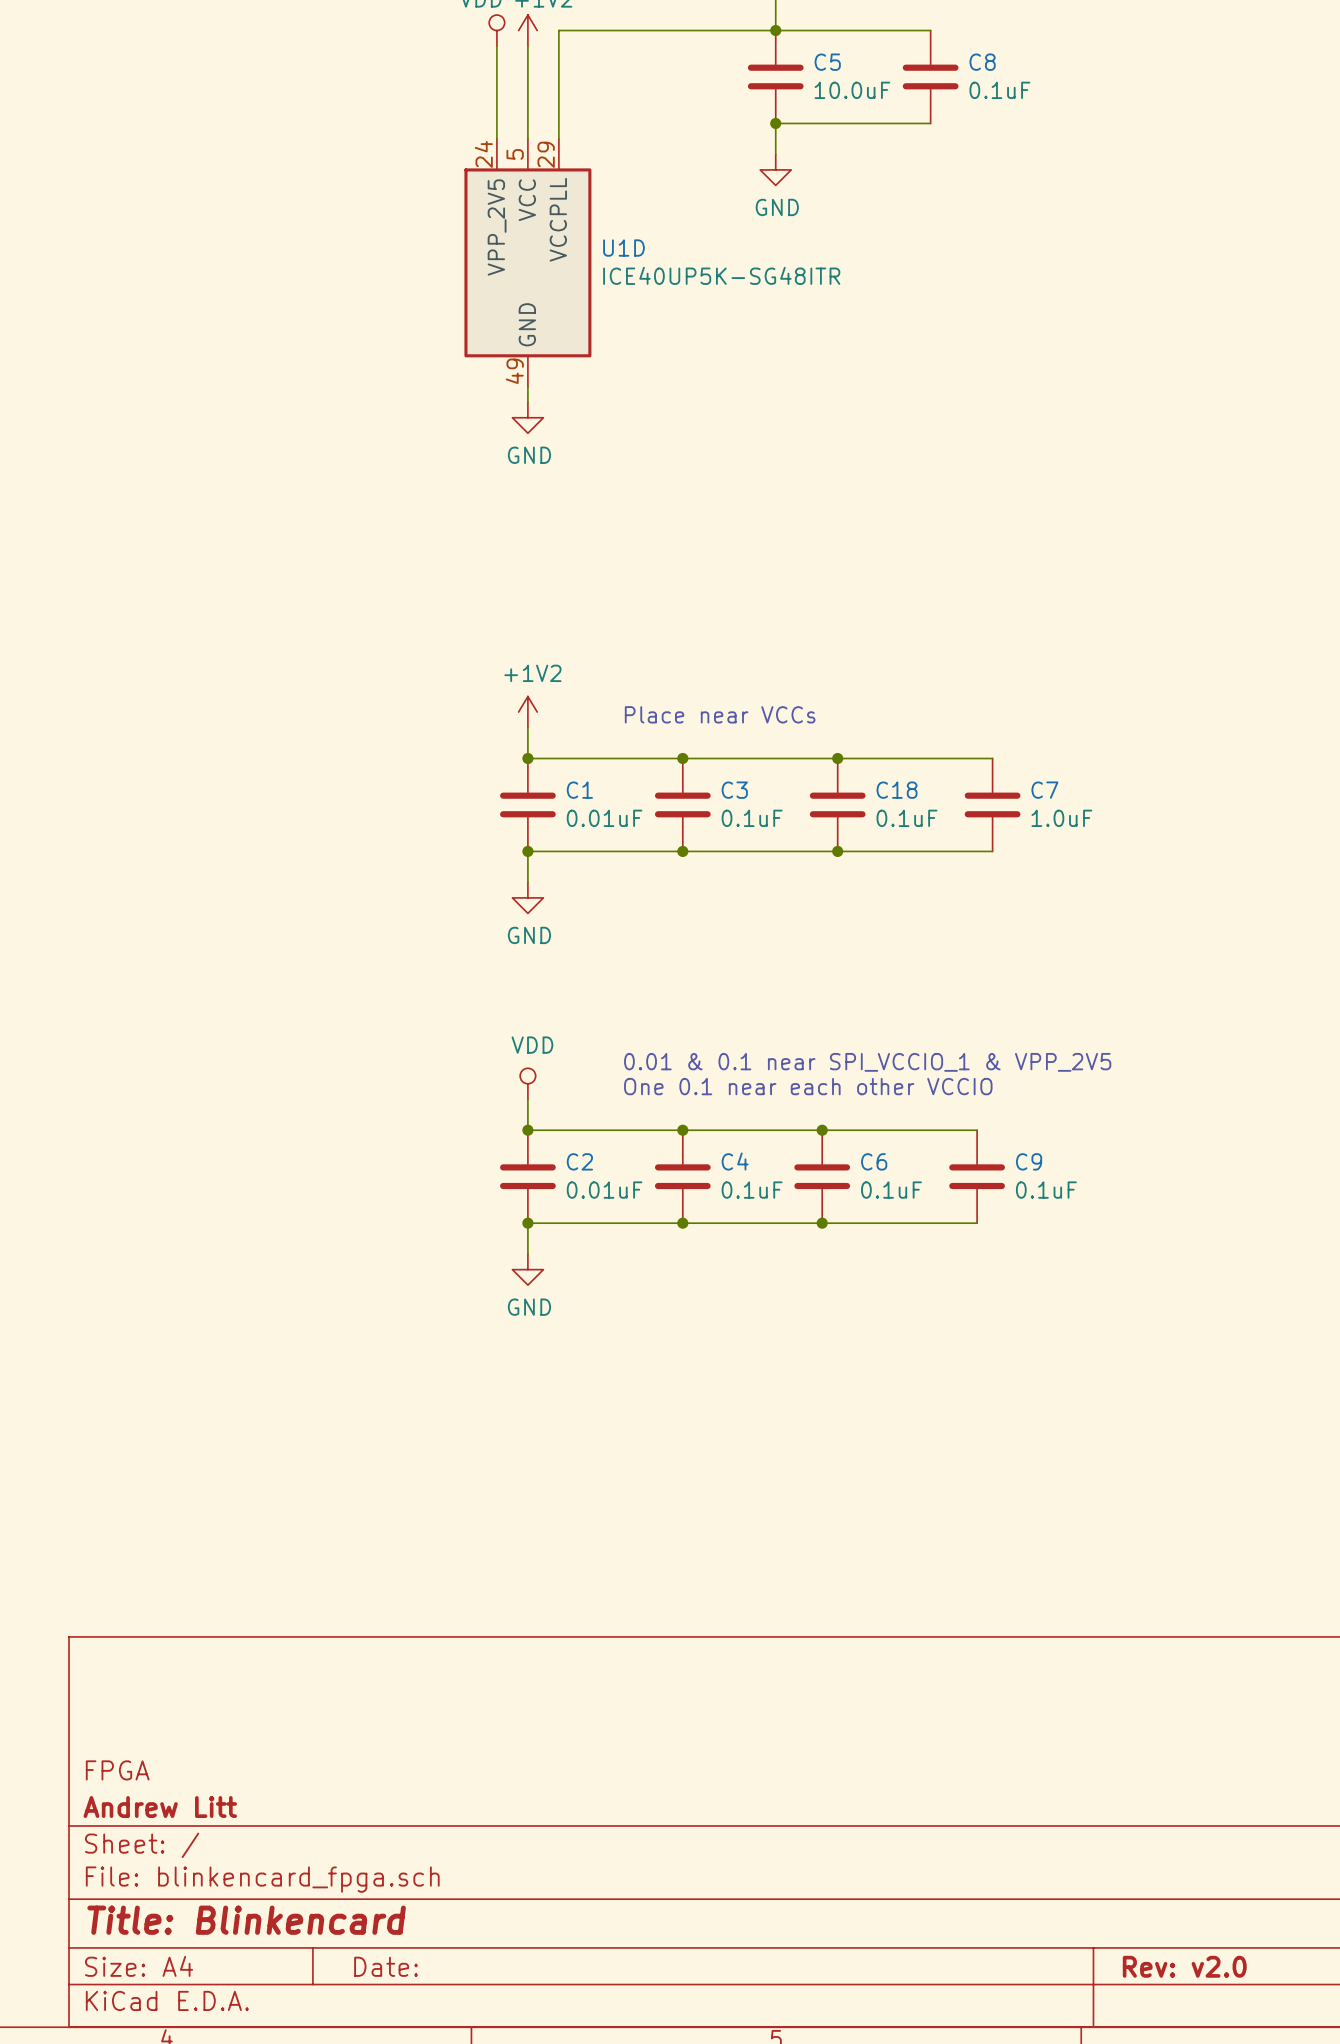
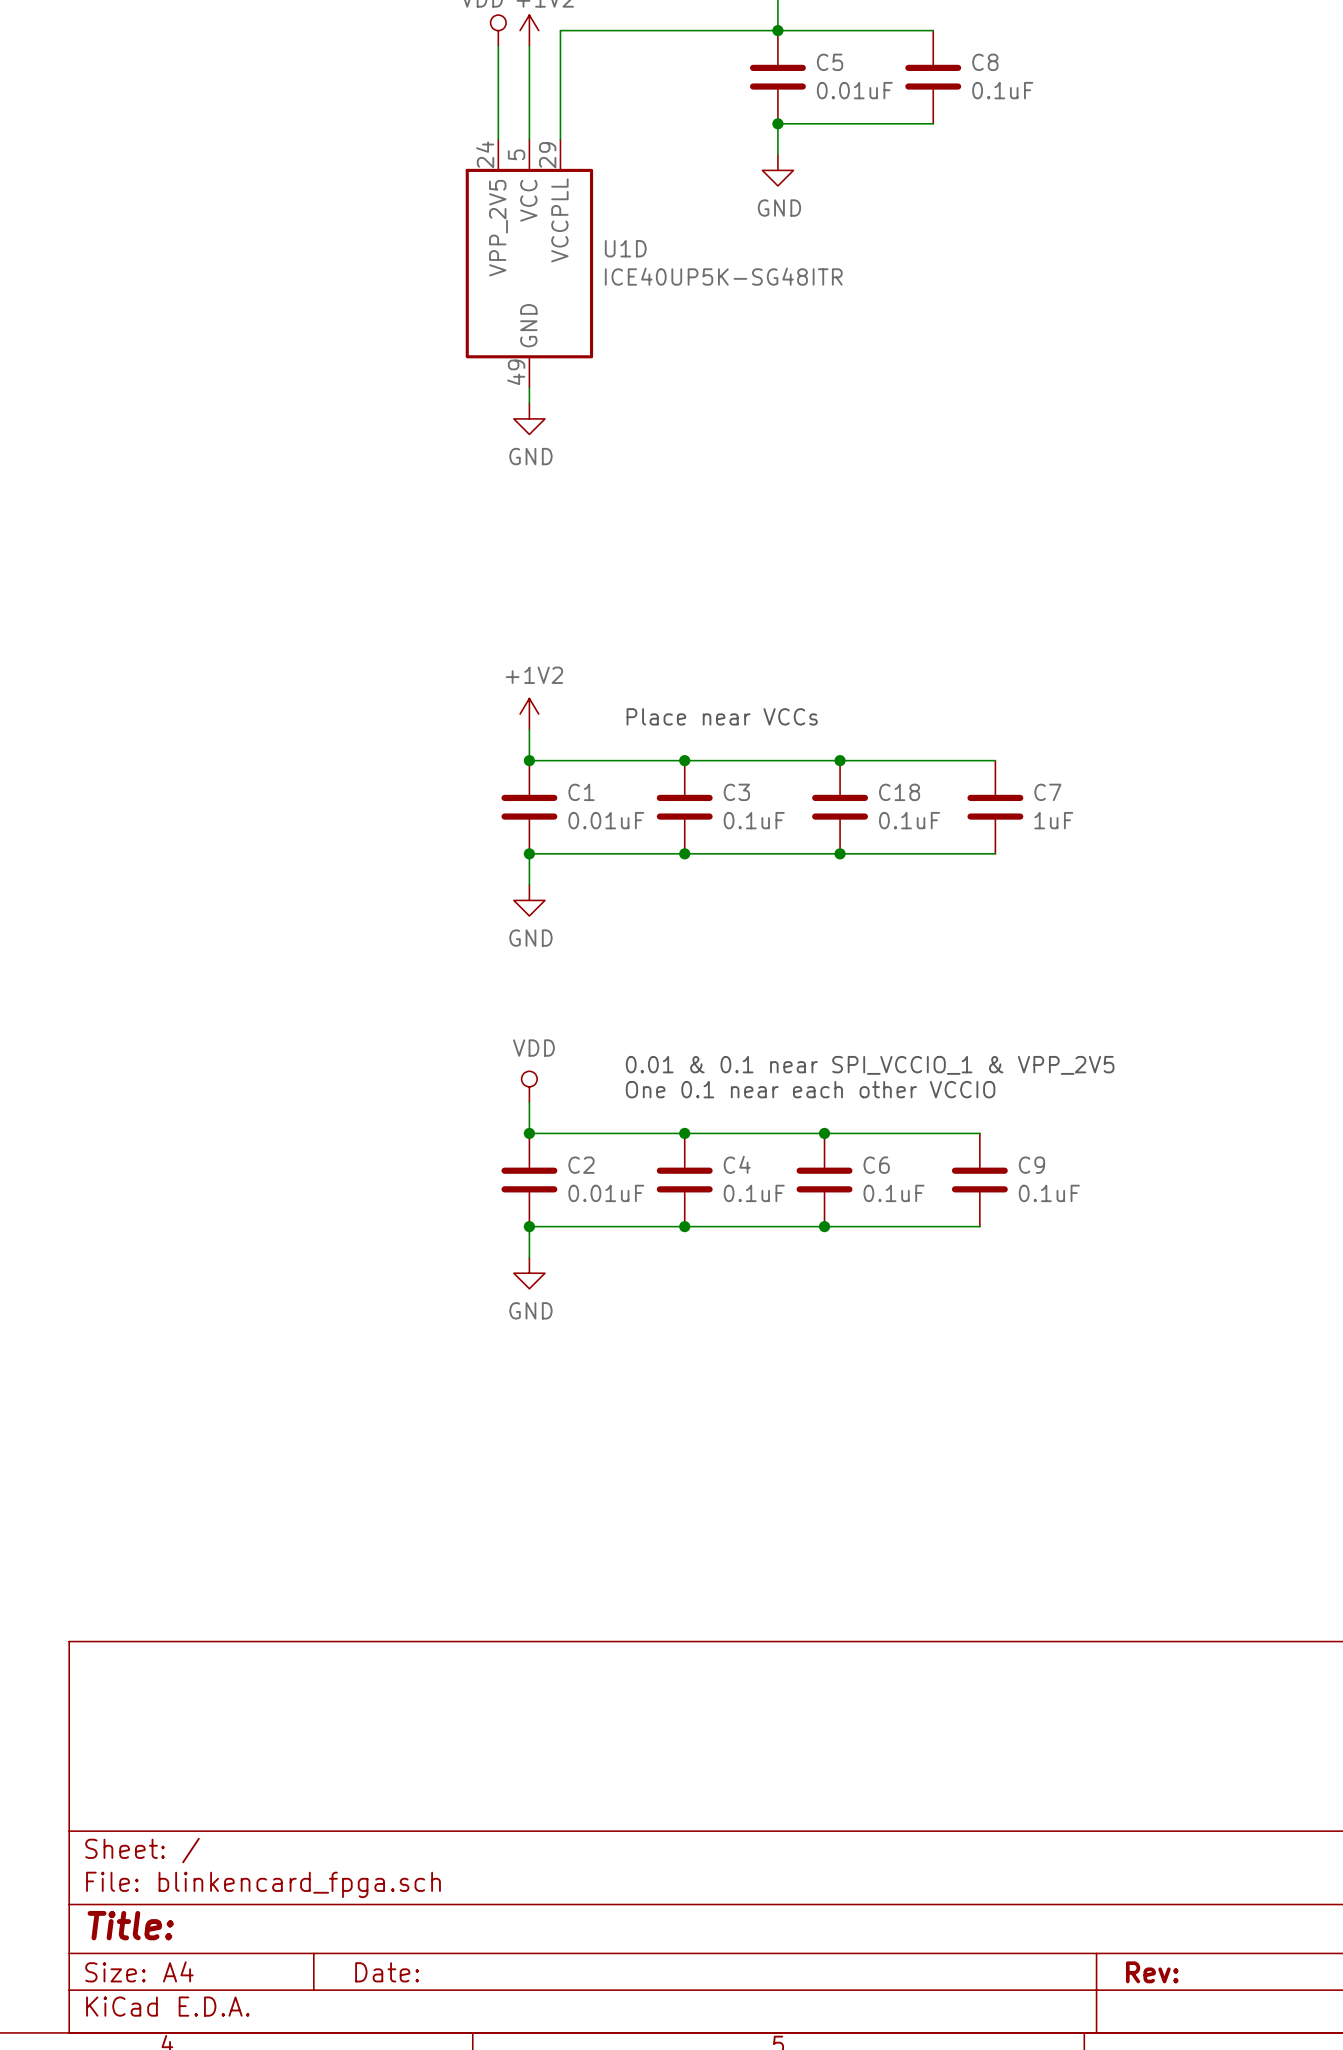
C5 value: 10.0uF (852, 90) -> 0.01uF (854, 90)
C7 value: 1.0uF (1061, 818) -> 1uF (1053, 820)
title block: FPGA (117, 1770) -> none
title block: Andrew Litt (160, 1807) -> none
title block: Title: Blinkencard (246, 1920) -> Title: (130, 1925)
title block: Rev: v2.0 (1184, 1966) -> Rev: (1152, 1972)

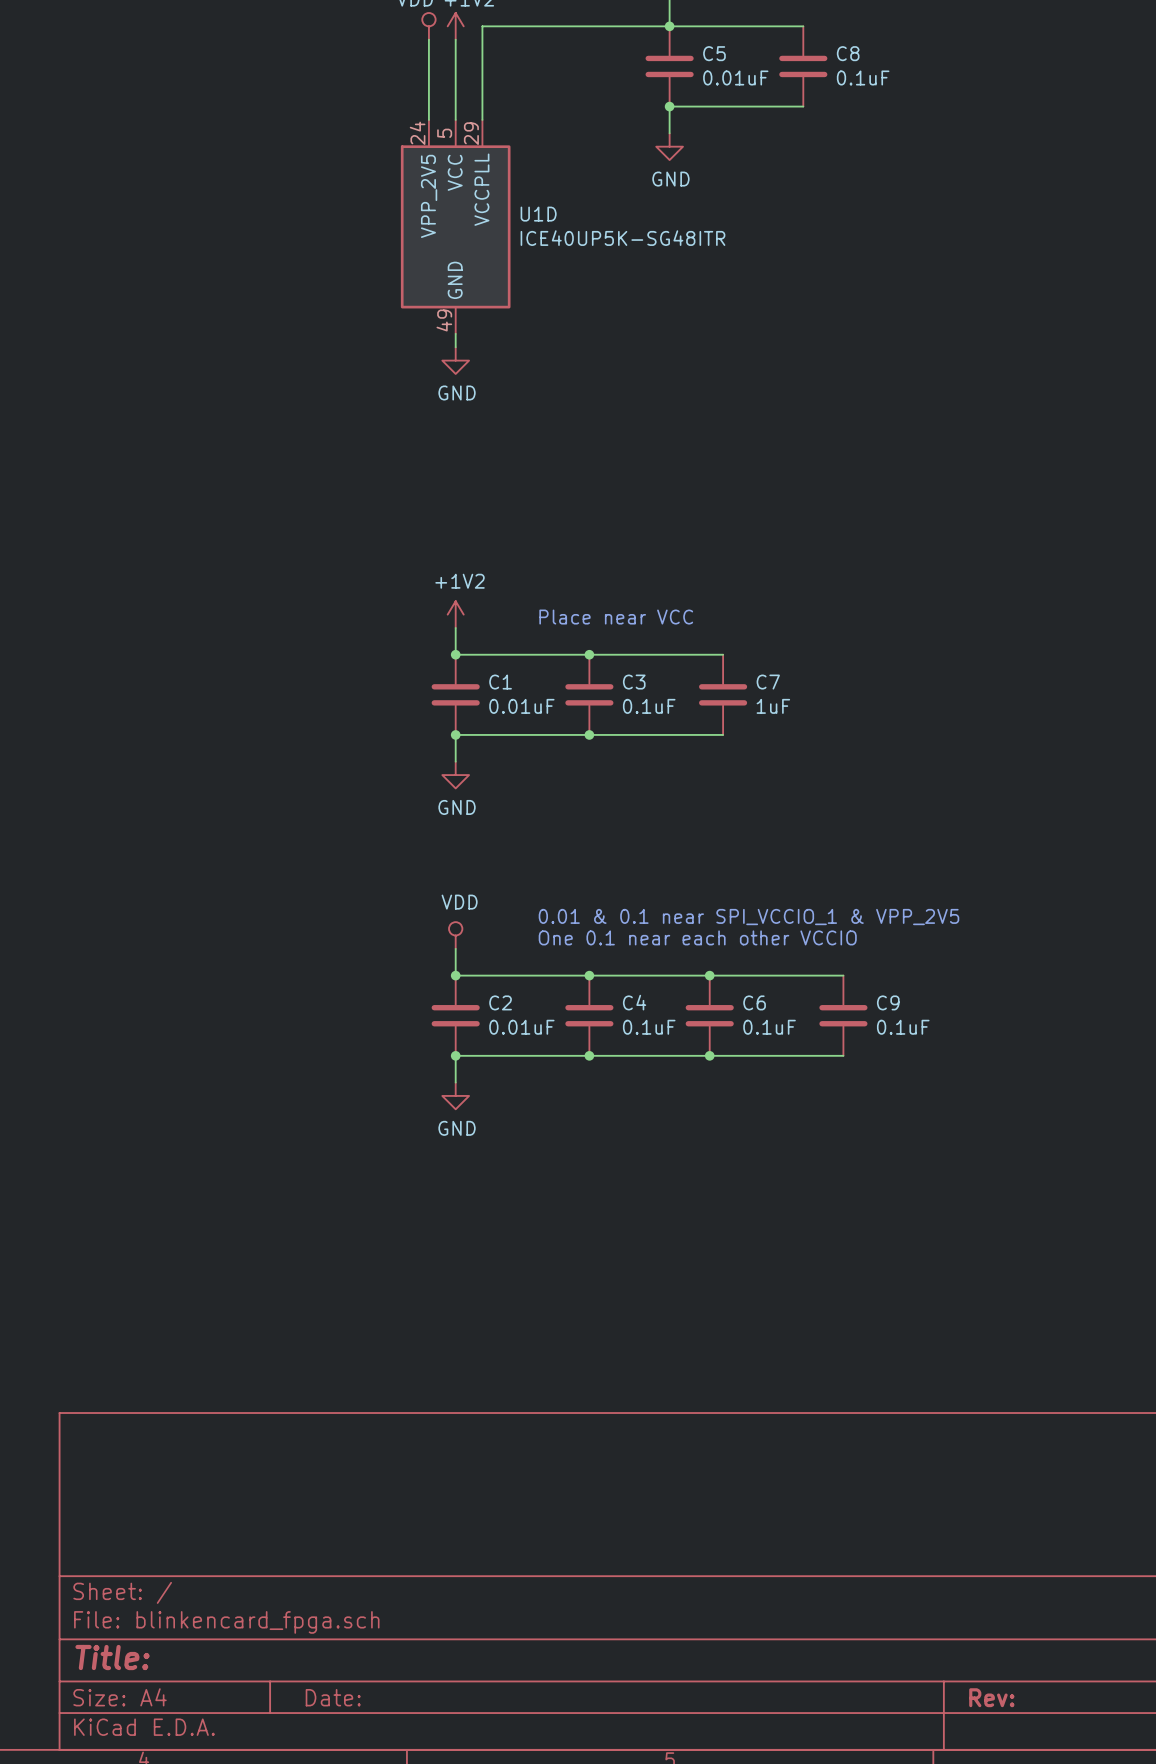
text: Place near VCCs (722, 716) -> Place near VCC (616, 617)
wire: (840, 760) (995, 760) -> none
junction: (840, 760) -> none
C18 name: C18 (899, 792) -> C7 (768, 682)
C7: 1uF (995, 807) -> none
C18 value: 0.1uF (909, 820) -> 1uF (773, 706)
wire: (840, 853) (995, 853) -> none
junction: (840, 853) -> none

